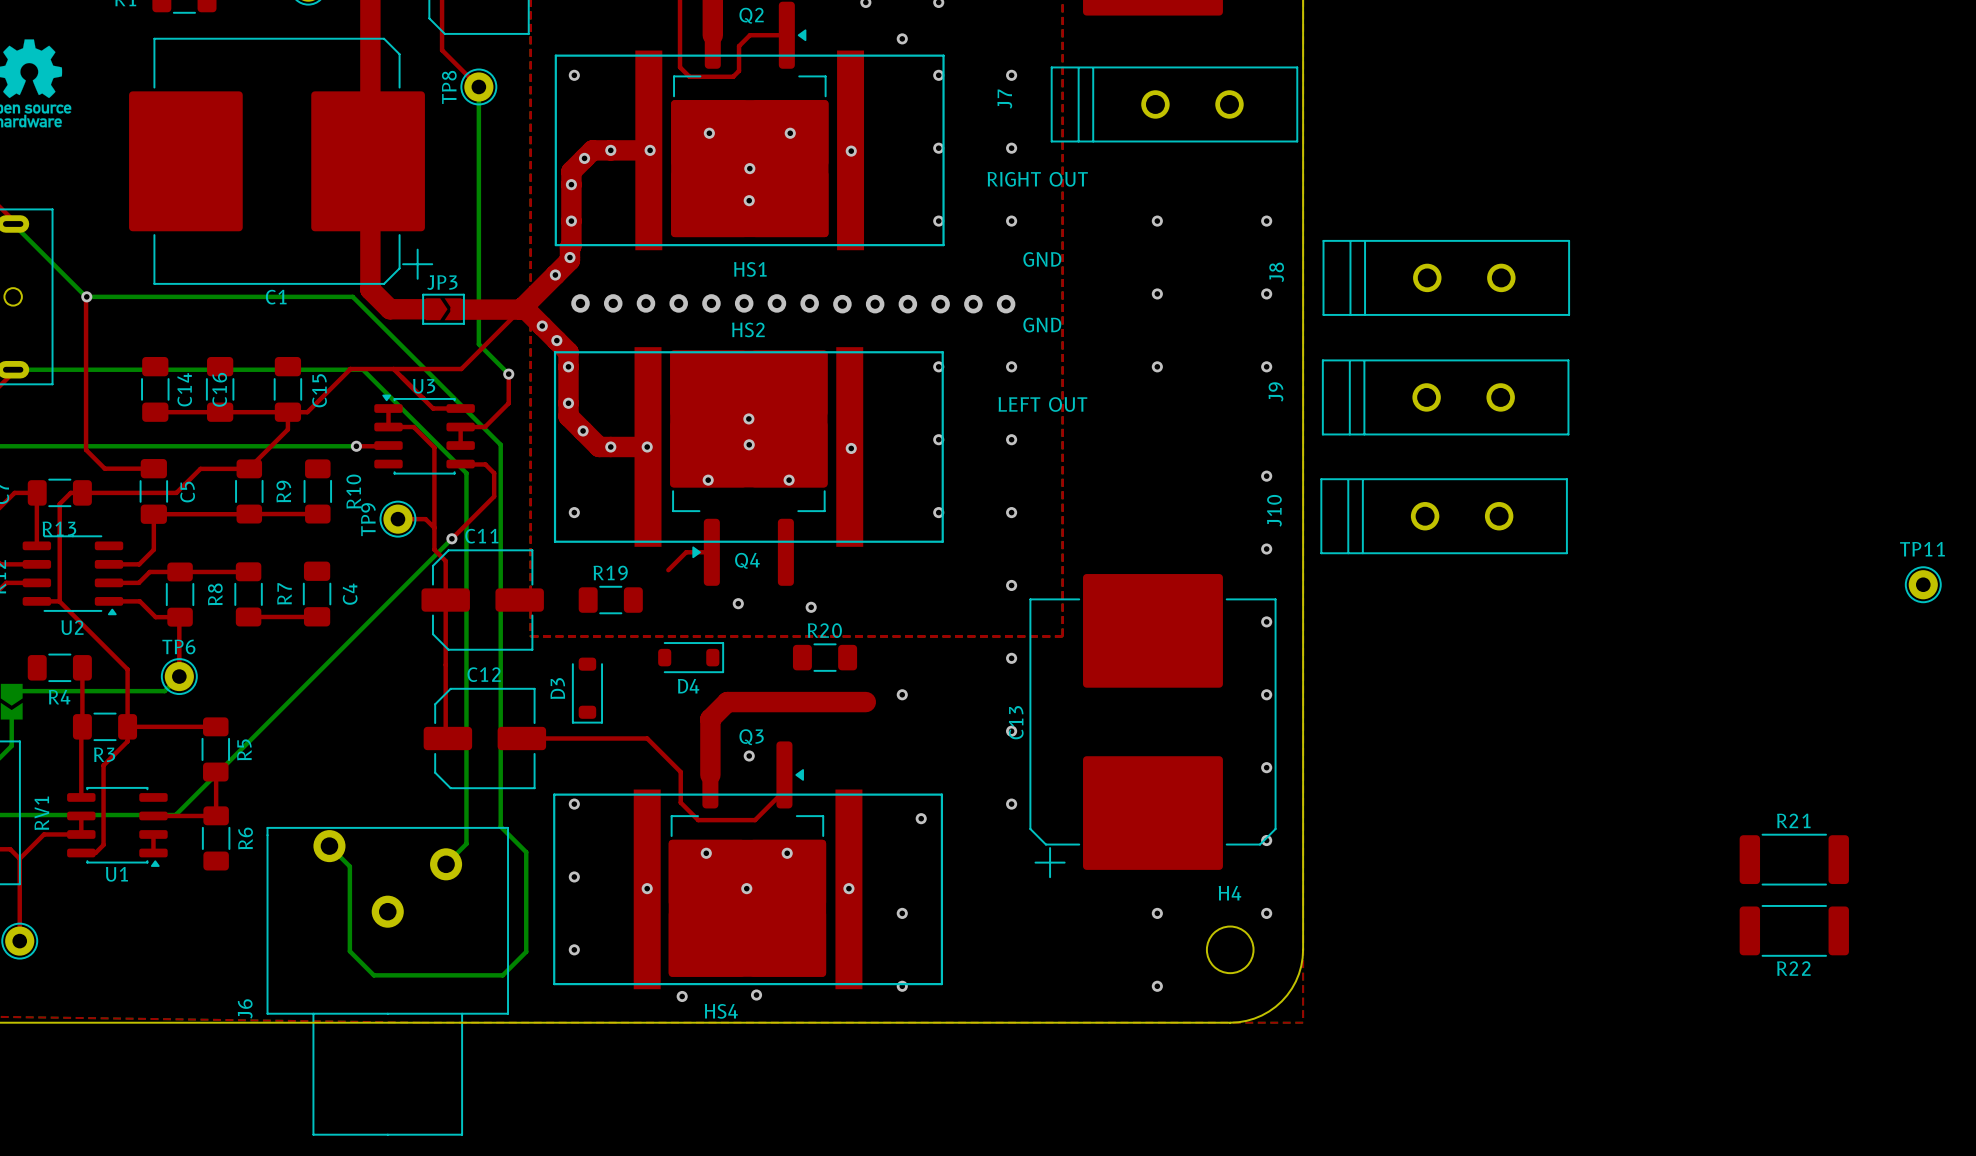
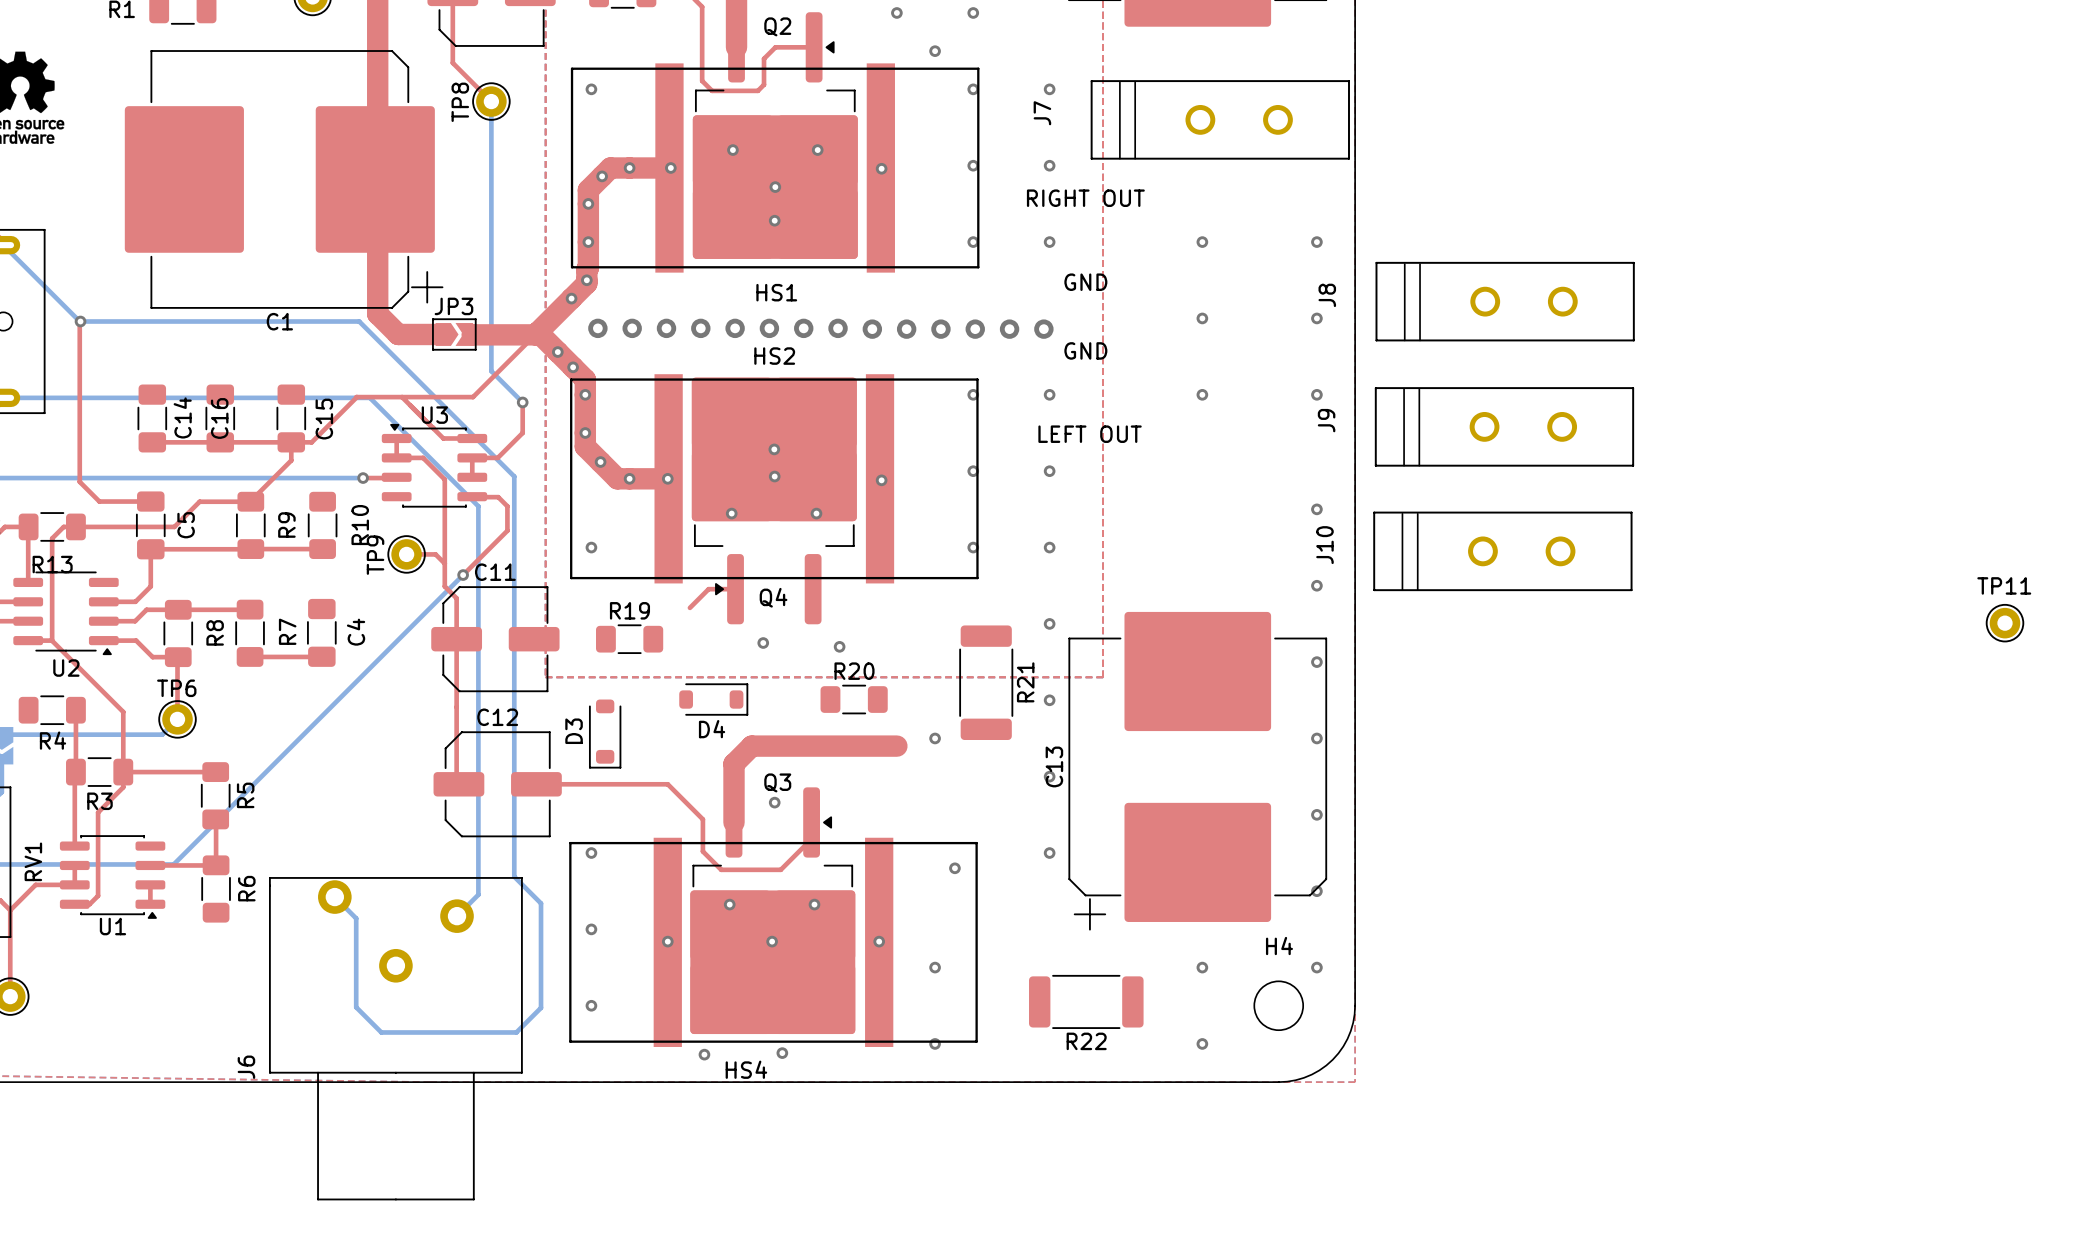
R21 rotation: 0° (1794, 859) -> 90° clockwise (986, 682)
R21 position: (1794, 859) -> (986, 682)
R22 position: (1794, 930) -> (1086, 1001)

